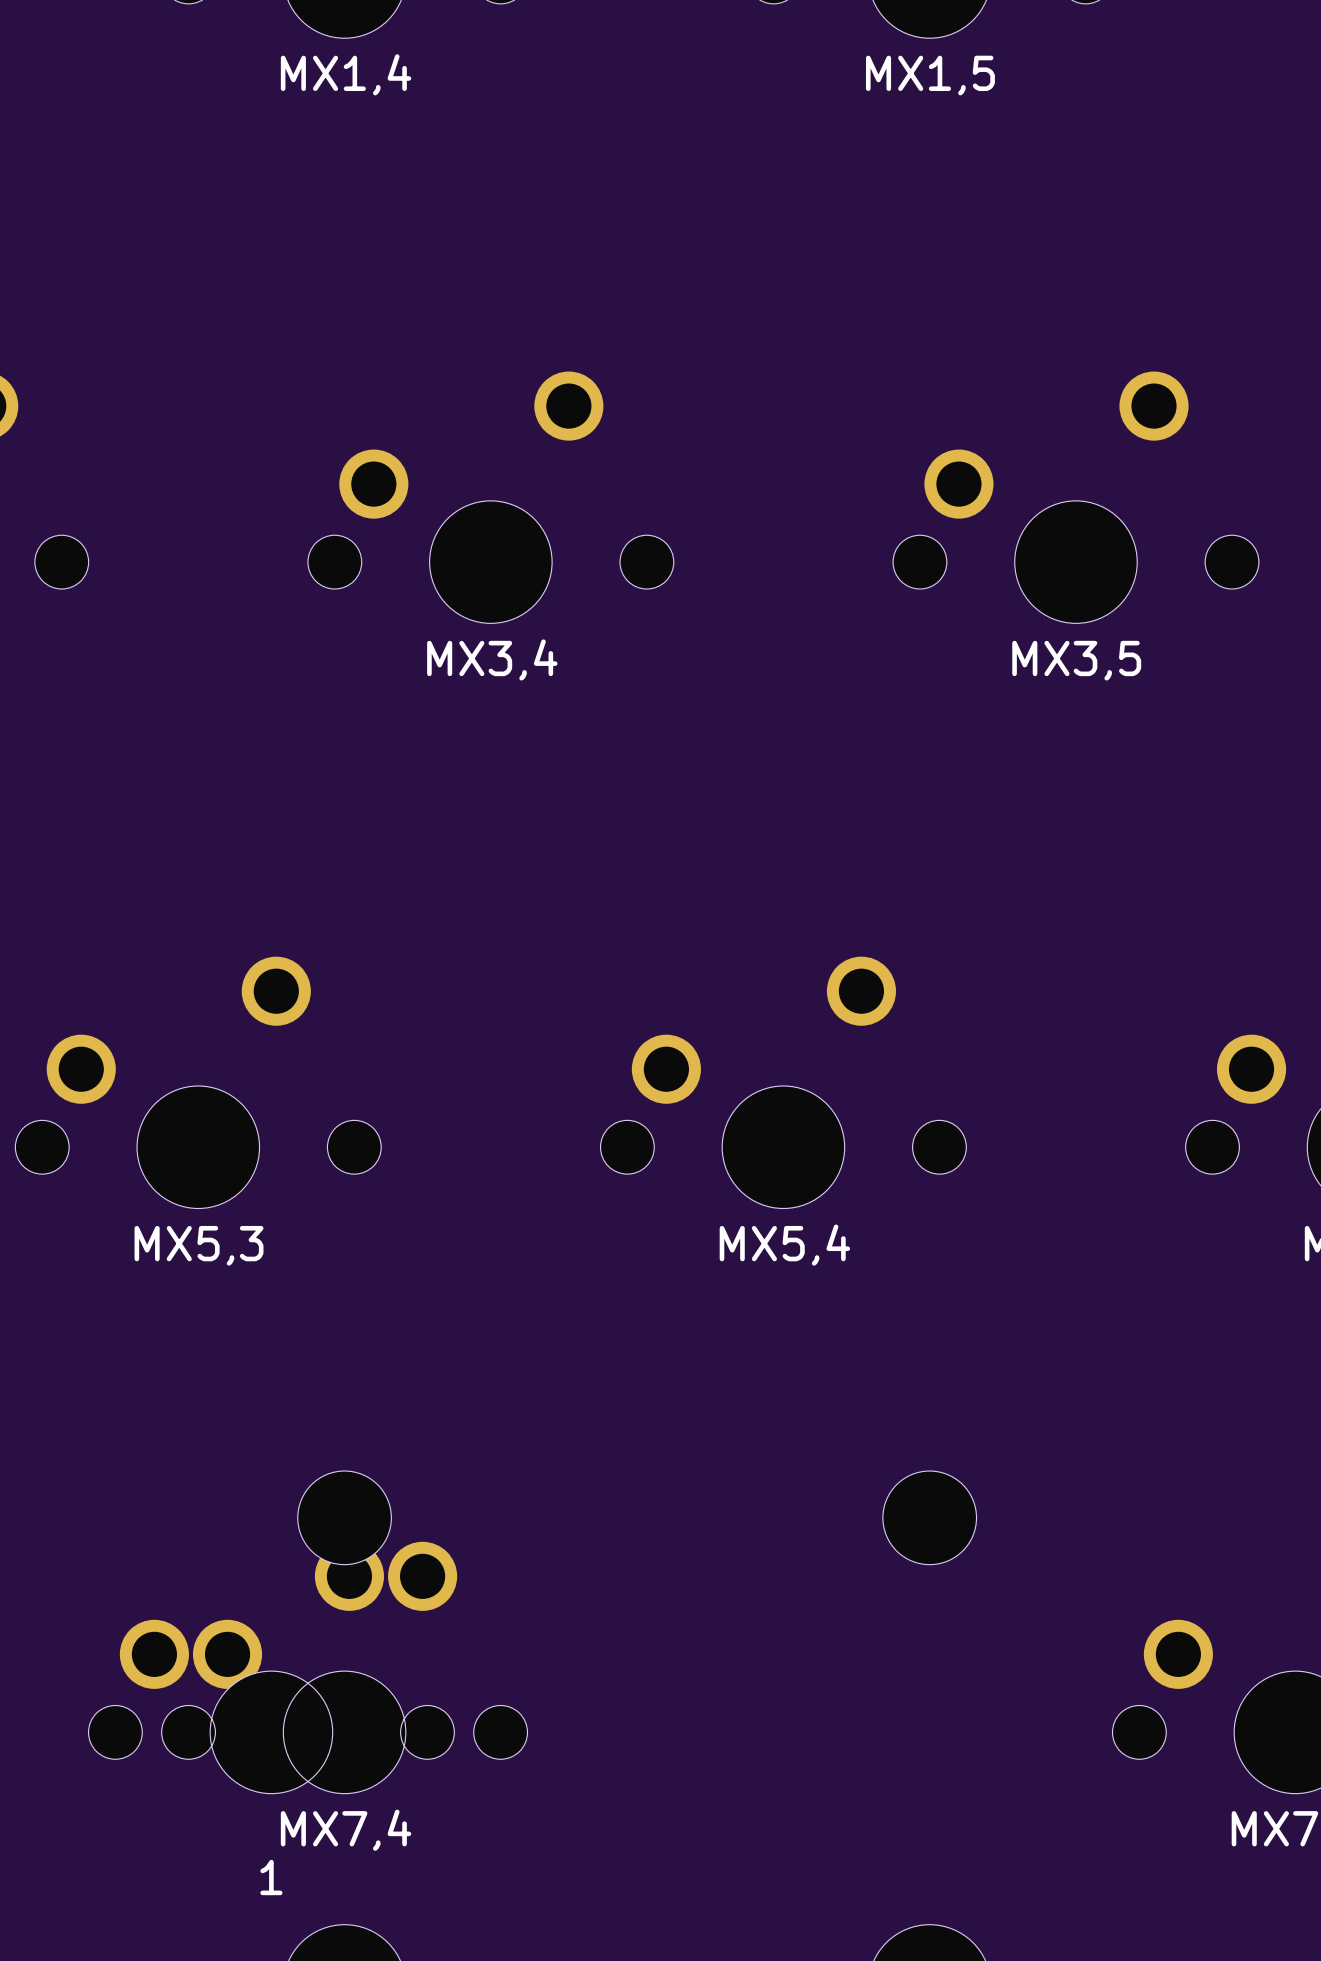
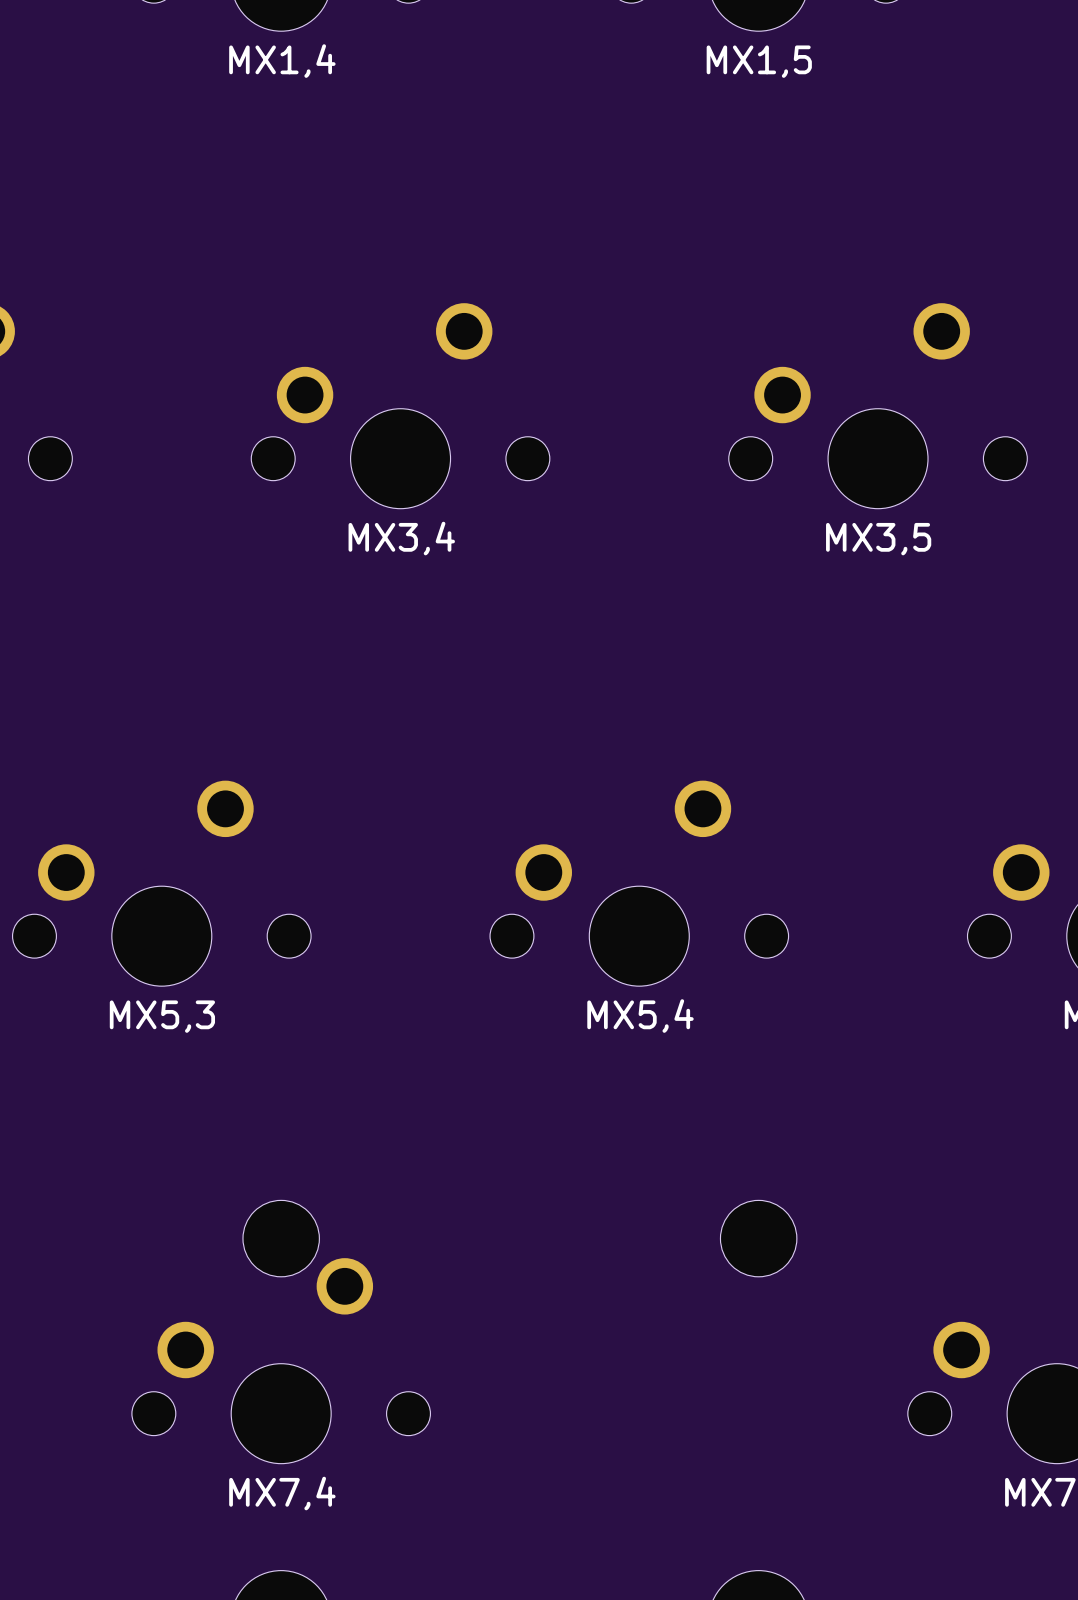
part: (271, 1667) -> none
text: 1 (271, 1877) -> none

